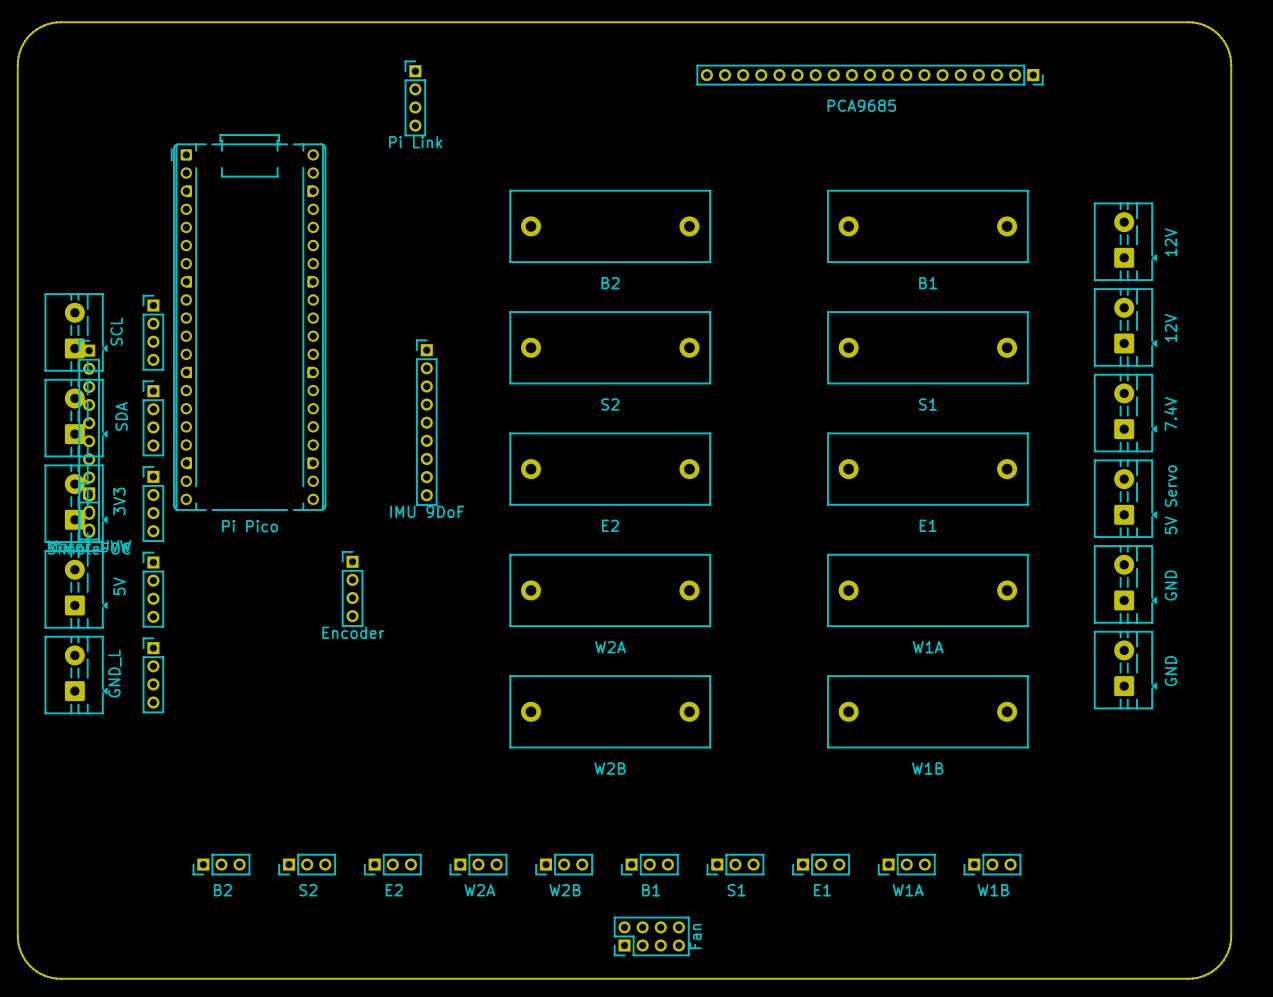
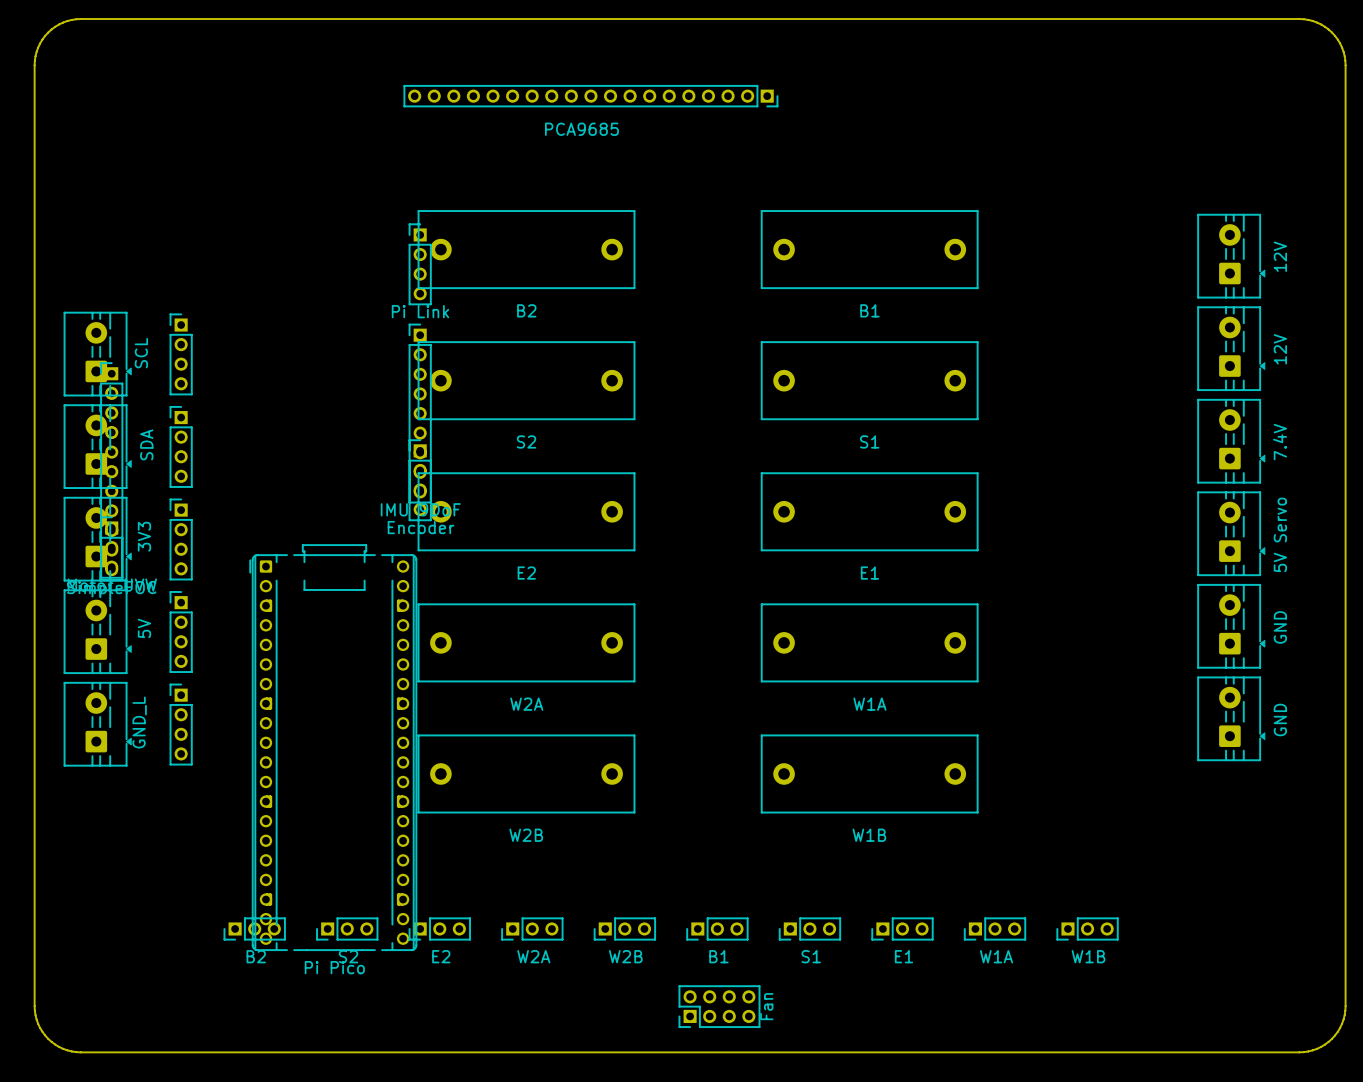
part: PCA9685 (870, 75) -> none
part: none -> PCA9685 (590, 96)
part position: (415, 98) -> (420, 264)
part position: (610, 226) -> (526, 249)
part position: (927, 226) -> (869, 249)
part: Pi Pico (248, 322) -> none
part position: (610, 347) -> (526, 380)
part position: (927, 347) -> (869, 380)
part position: (426, 422) -> (420, 413)
part position: (610, 469) -> (526, 511)
part position: (927, 469) -> (869, 511)
part position: (352, 588) -> (420, 480)
part position: (610, 590) -> (526, 642)
part position: (927, 590) -> (869, 642)
part: none -> Pi Pico (333, 747)
part position: (610, 711) -> (526, 773)
part position: (927, 711) -> (869, 773)

